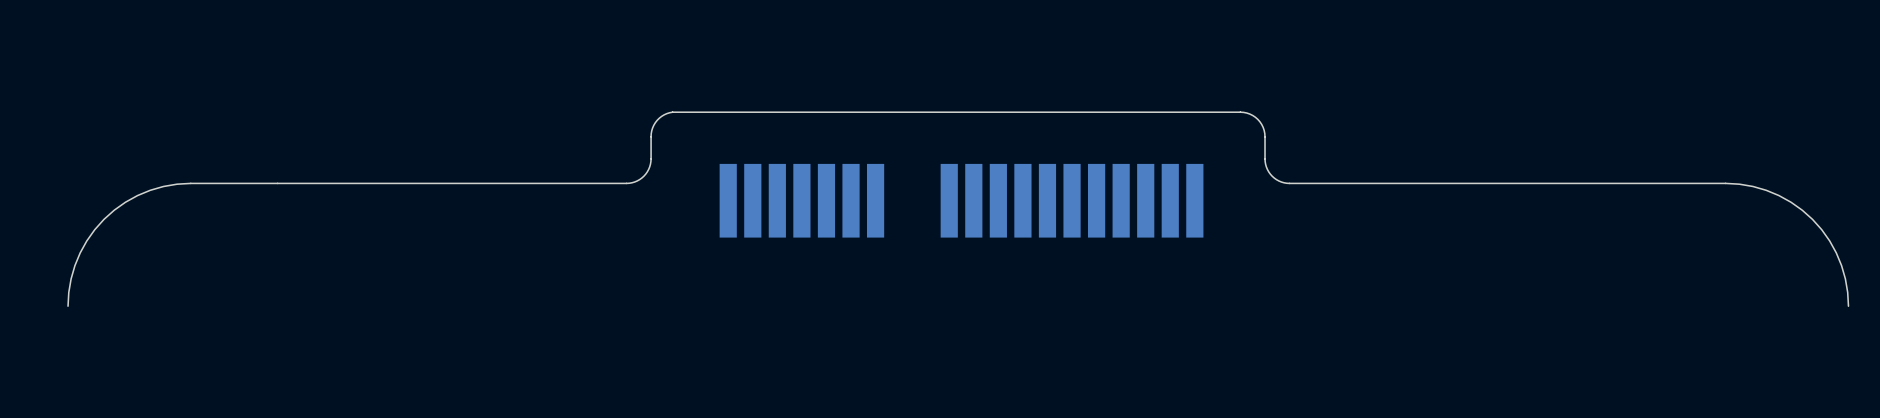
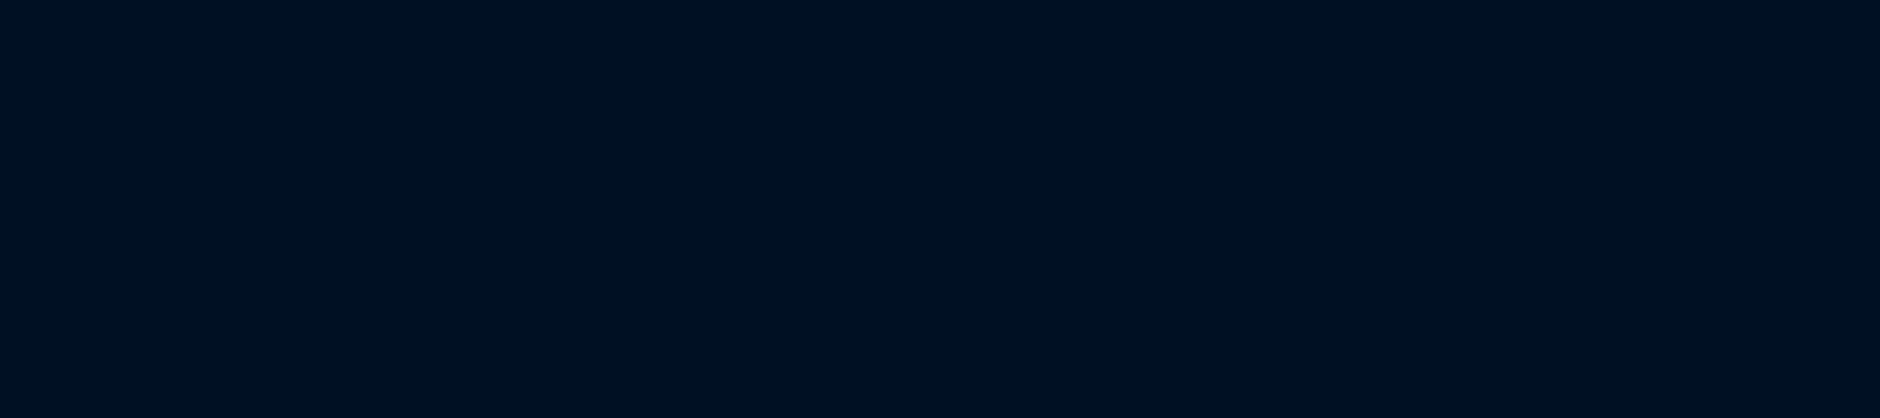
drawing: [67, 111, 1850, 307] -> none
part: (961, 200) -> none

